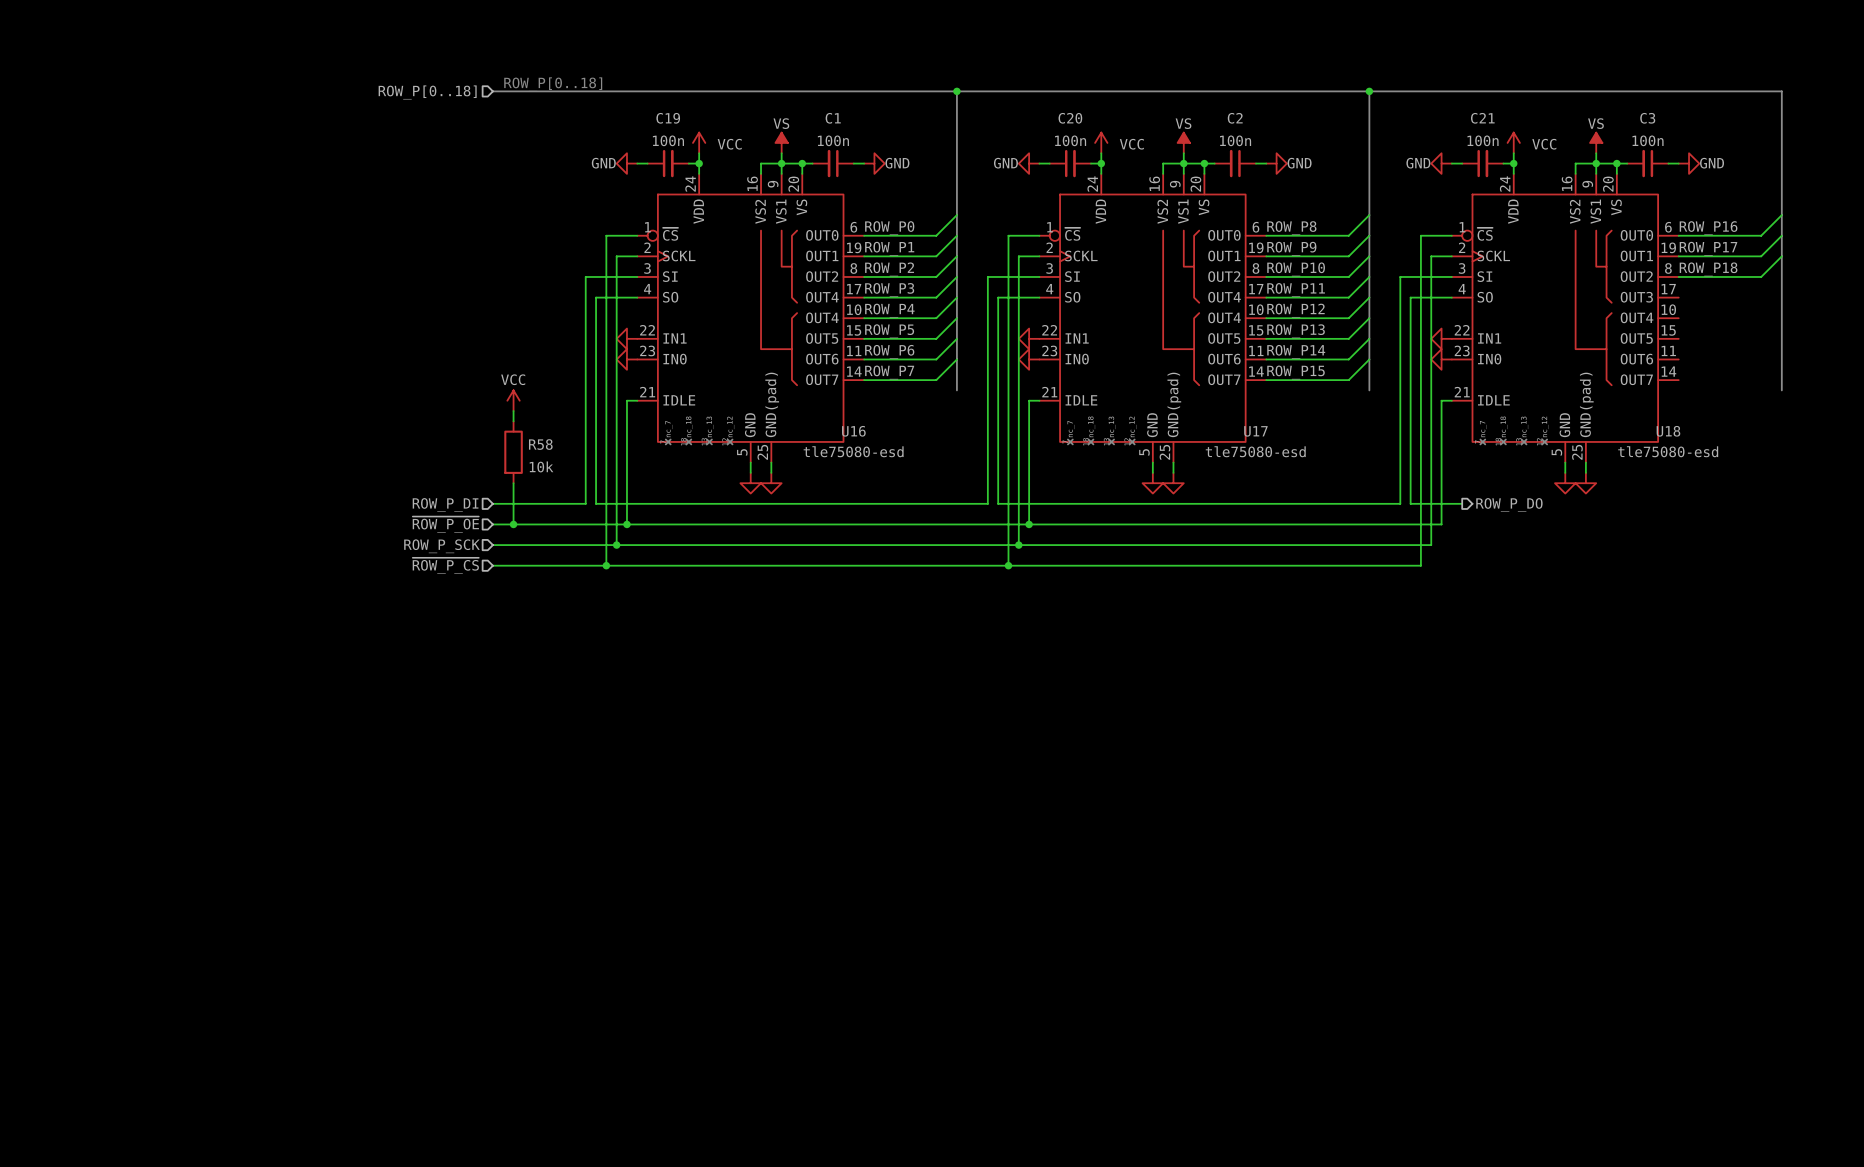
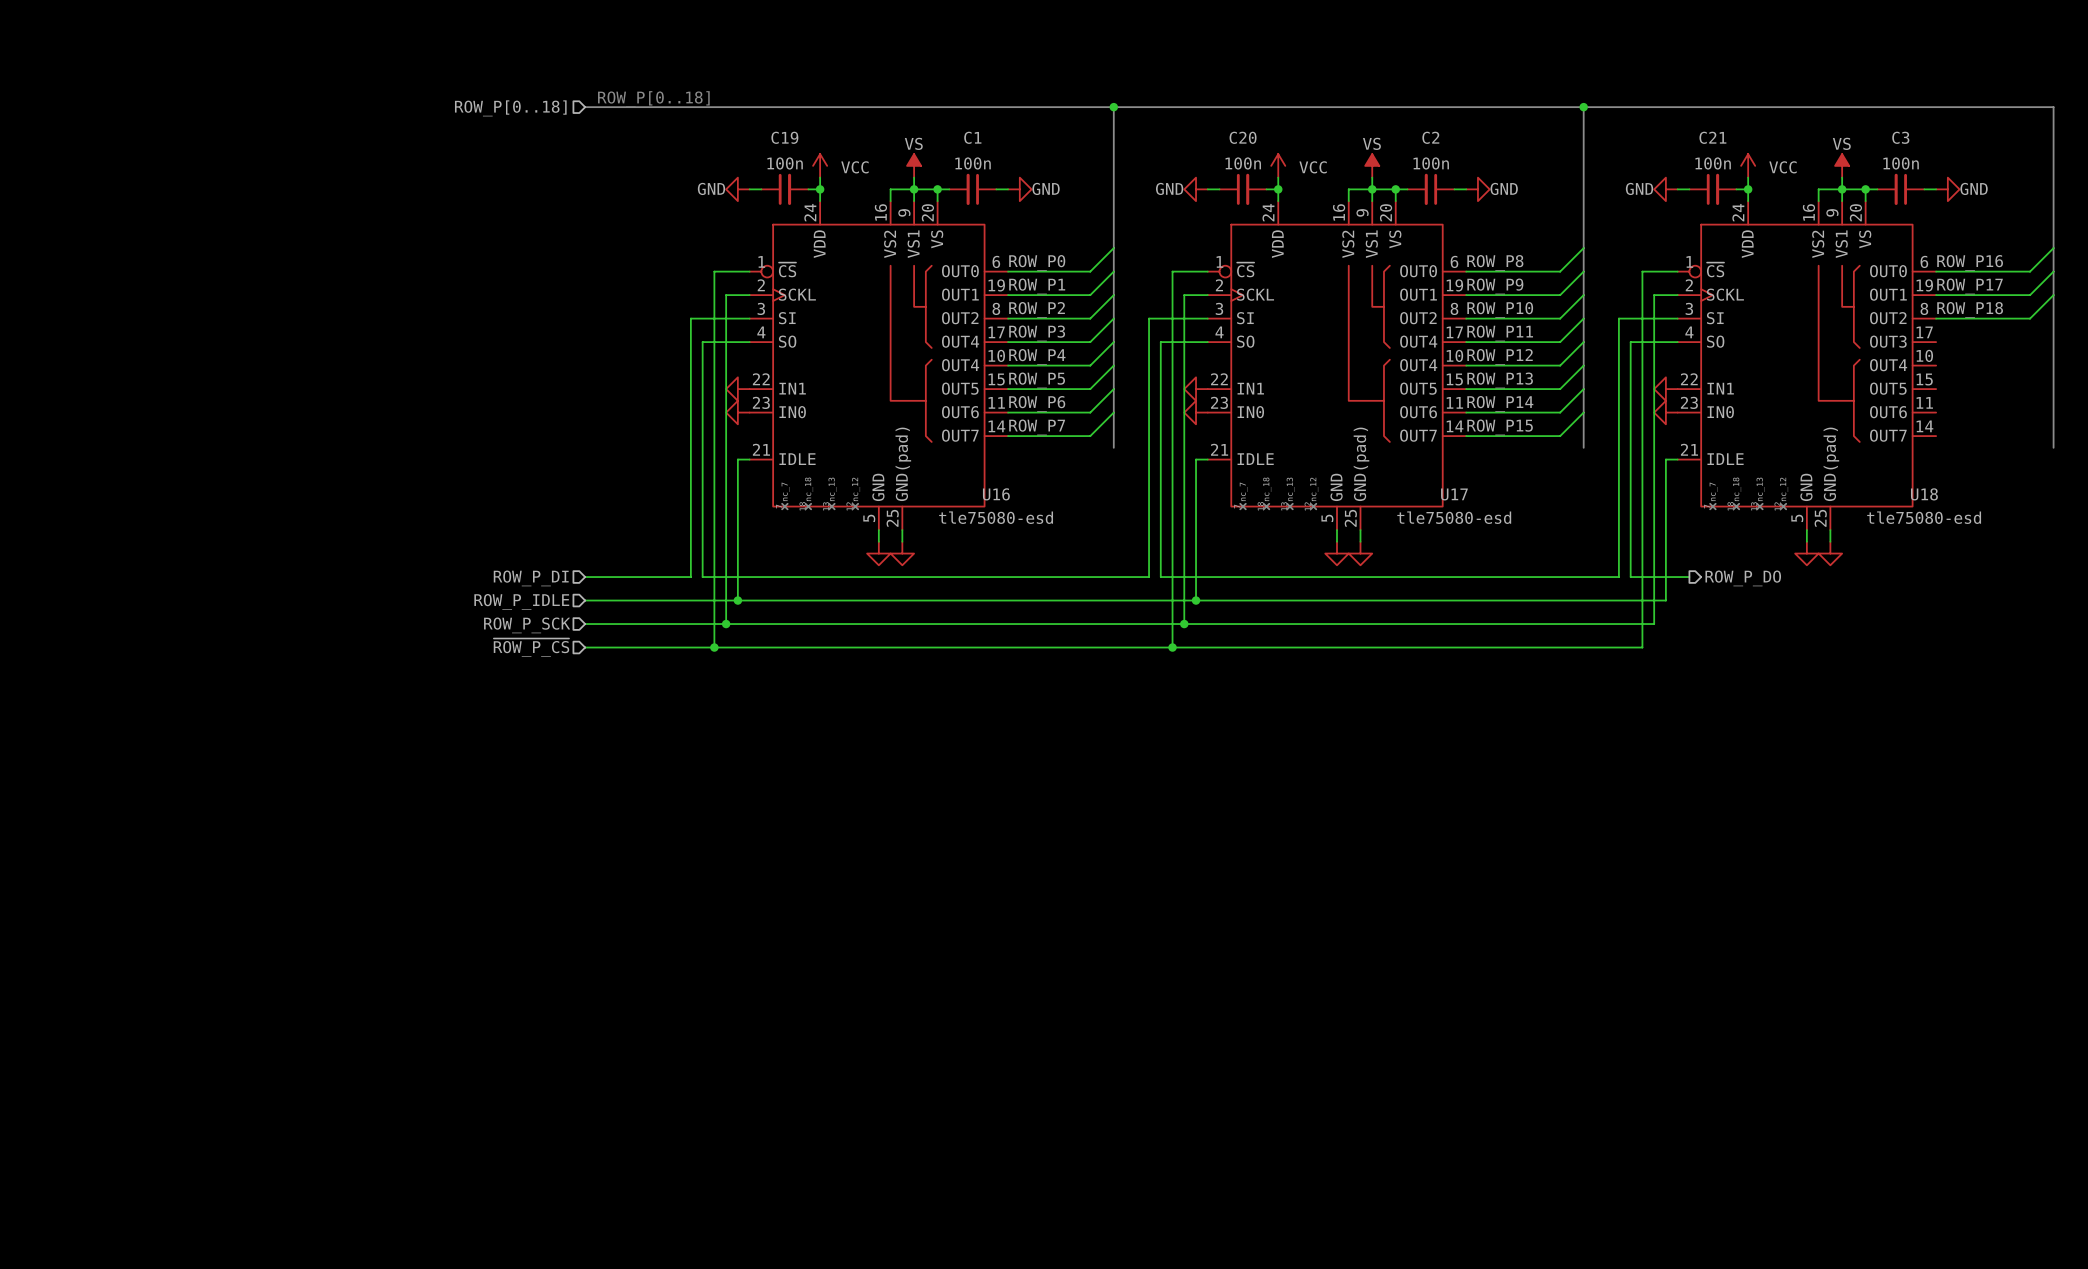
power symbol: VCC (513, 400) -> none
wire: (513, 411) (513, 421) -> none
R58: 10k (513, 452) -> none
wire: (513, 483) (513, 524) -> none
hierarchical label: ~{ROW_P_OE} (445, 524) -> ROW_P_IDLE (521, 601)
junction: (513, 524) -> none

